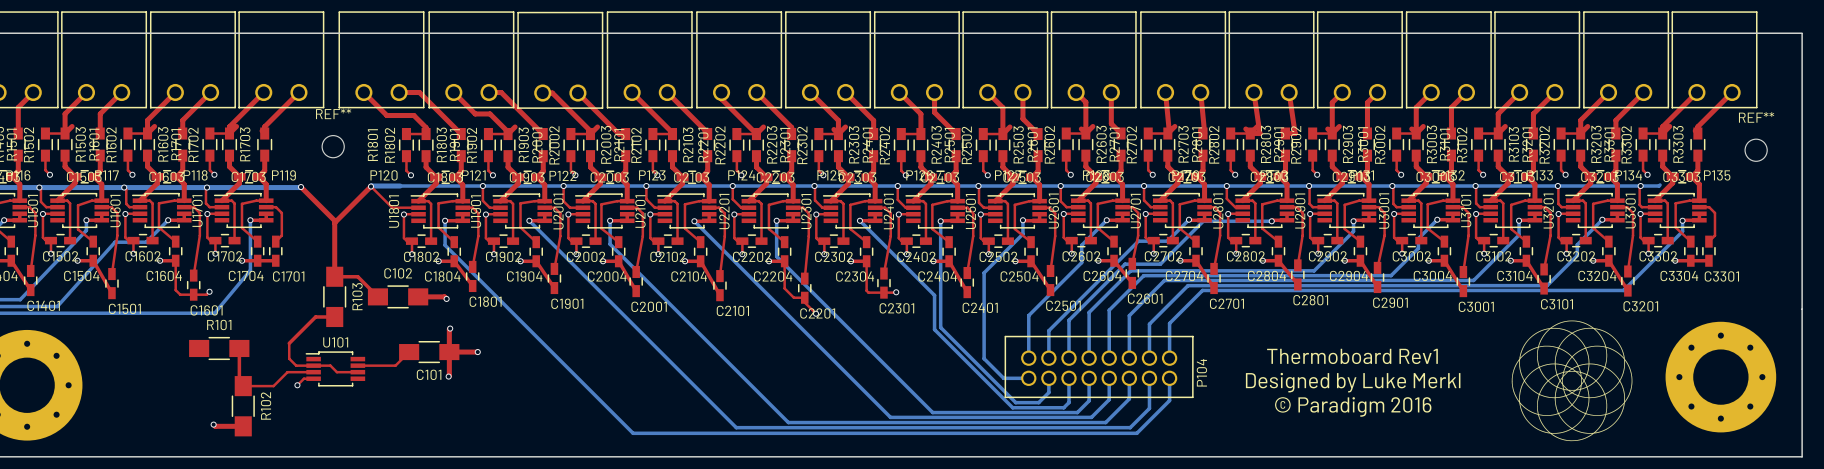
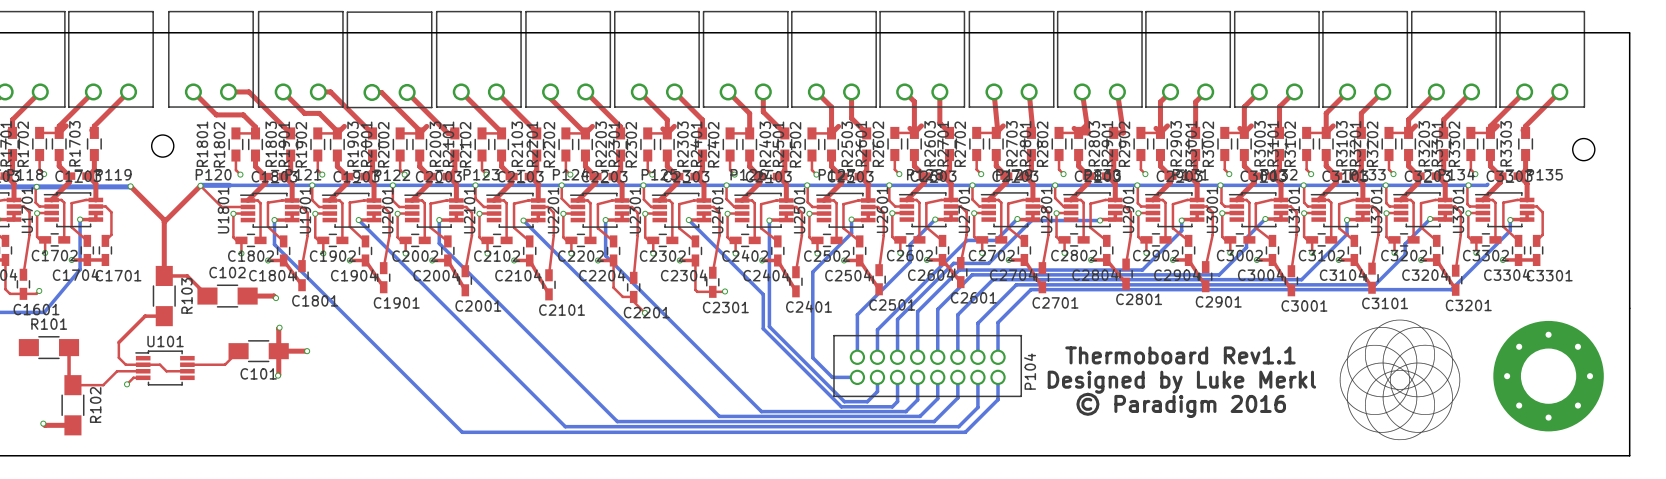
REF** name: REF** (333, 113) -> none
REF** name: REF** (1756, 117) -> none
text: Thermoboard Rev1 (1352, 356) -> Thermoboard Rev1.1 (1180, 355)

